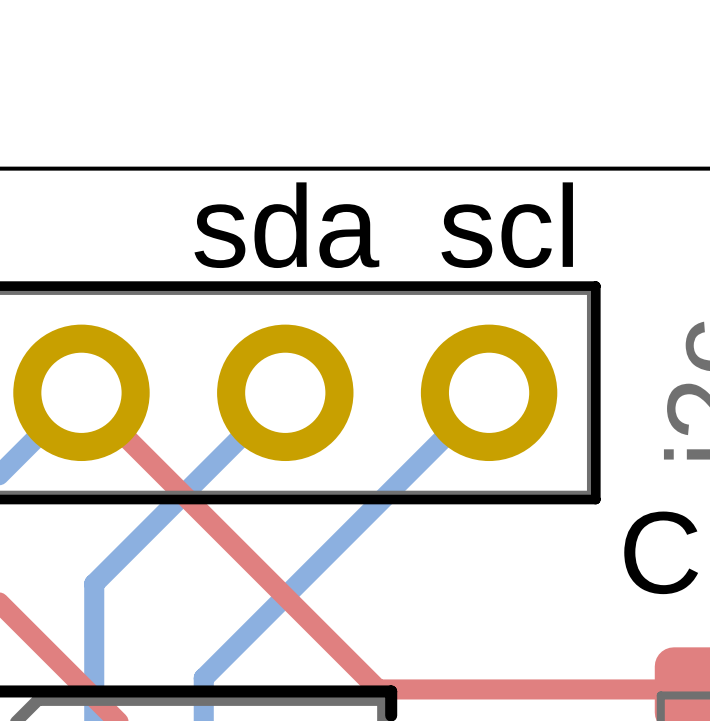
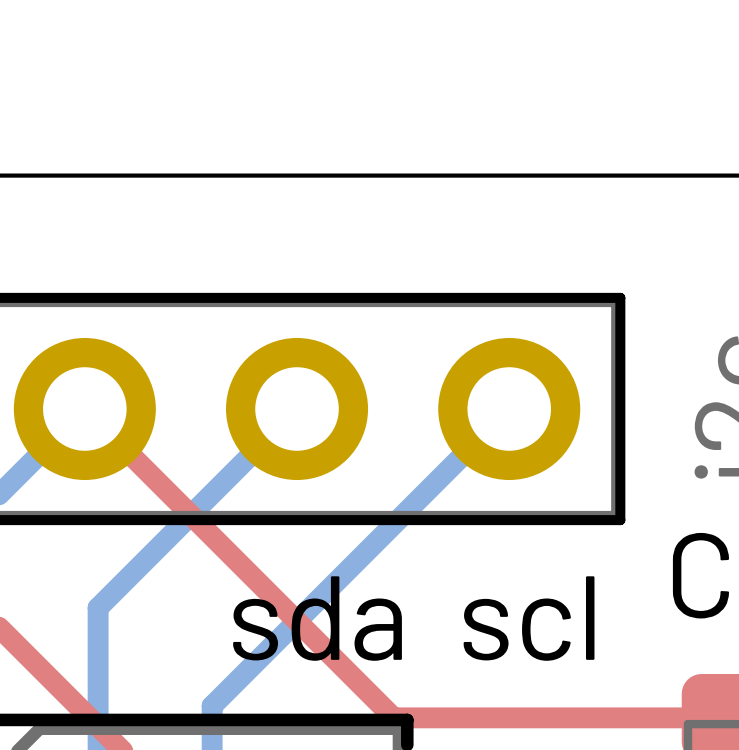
text position: sda (286, 225) -> sda (317, 618)
text position: scl (507, 225) -> scl (529, 618)

